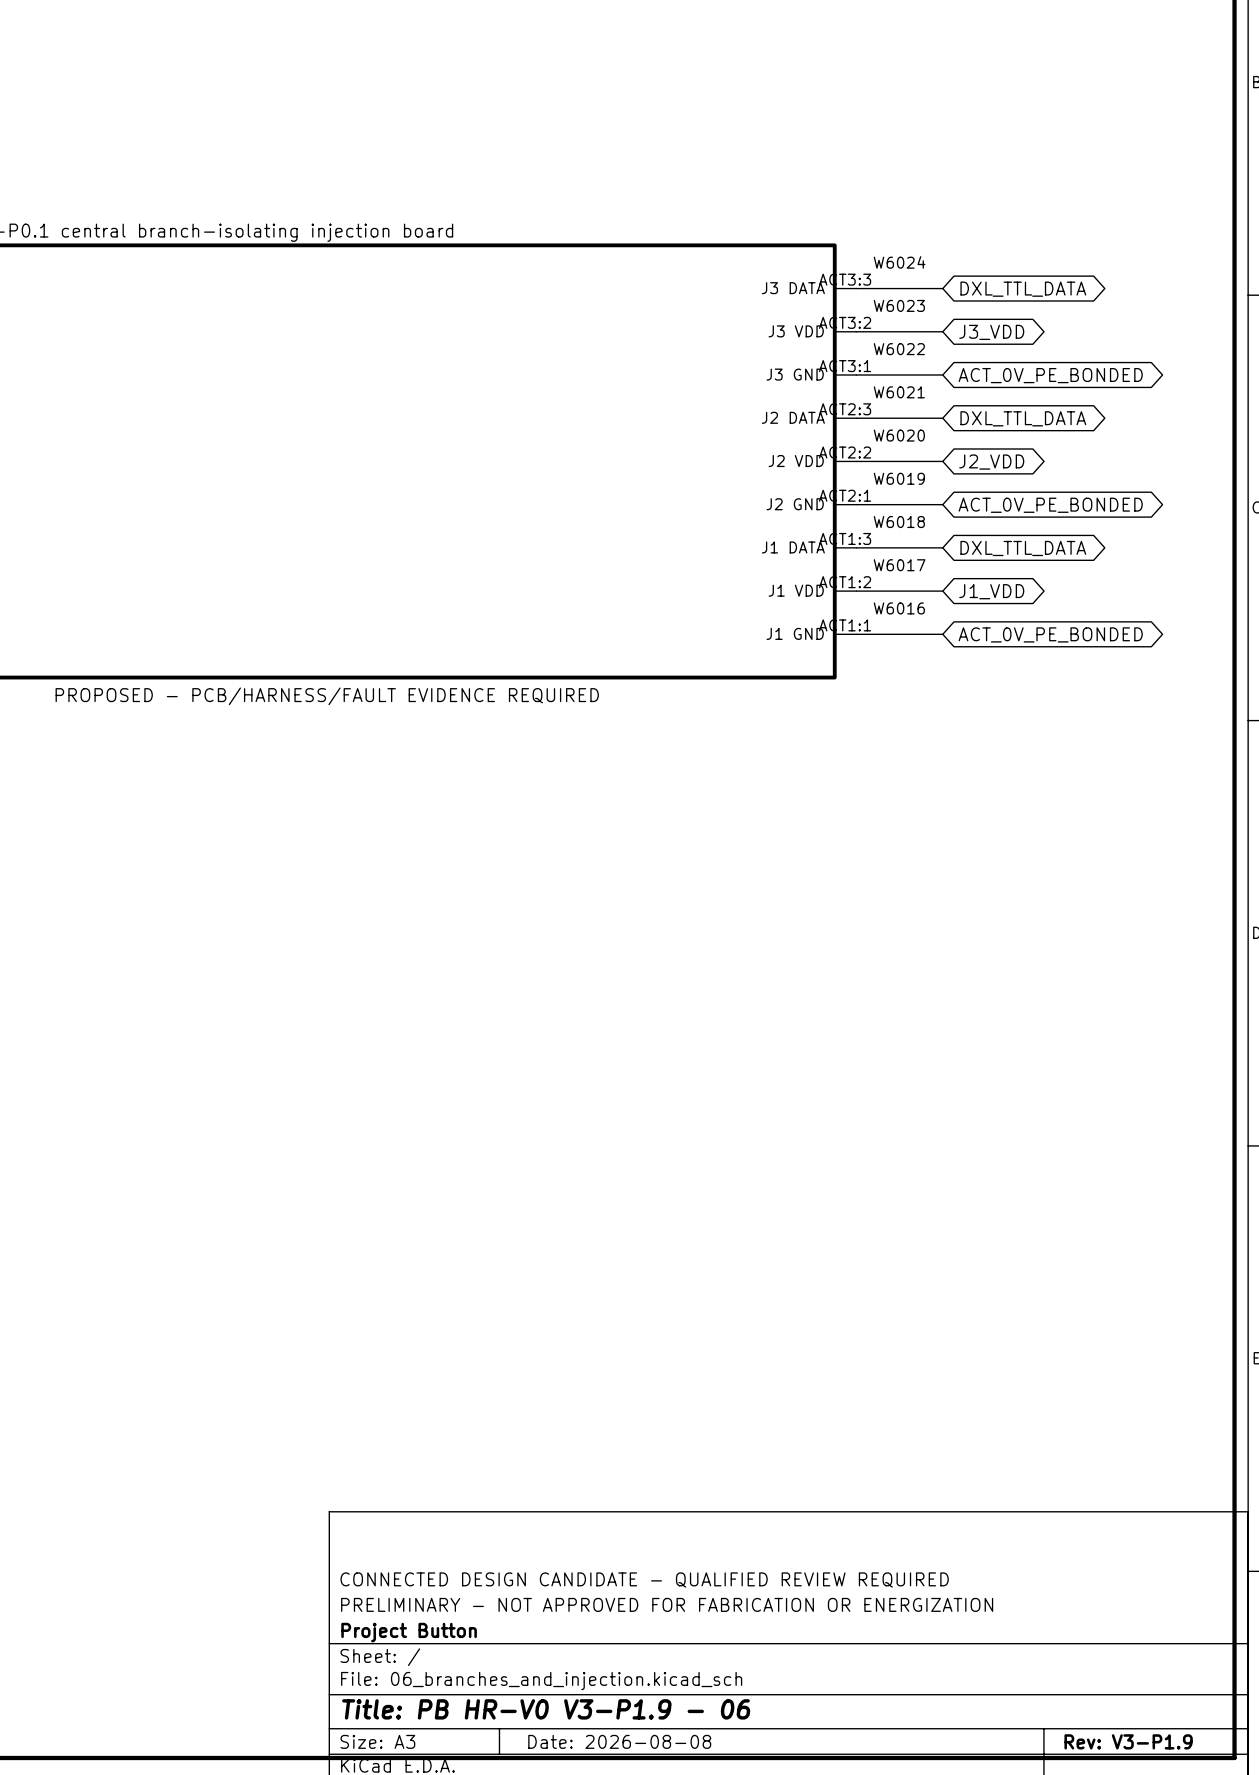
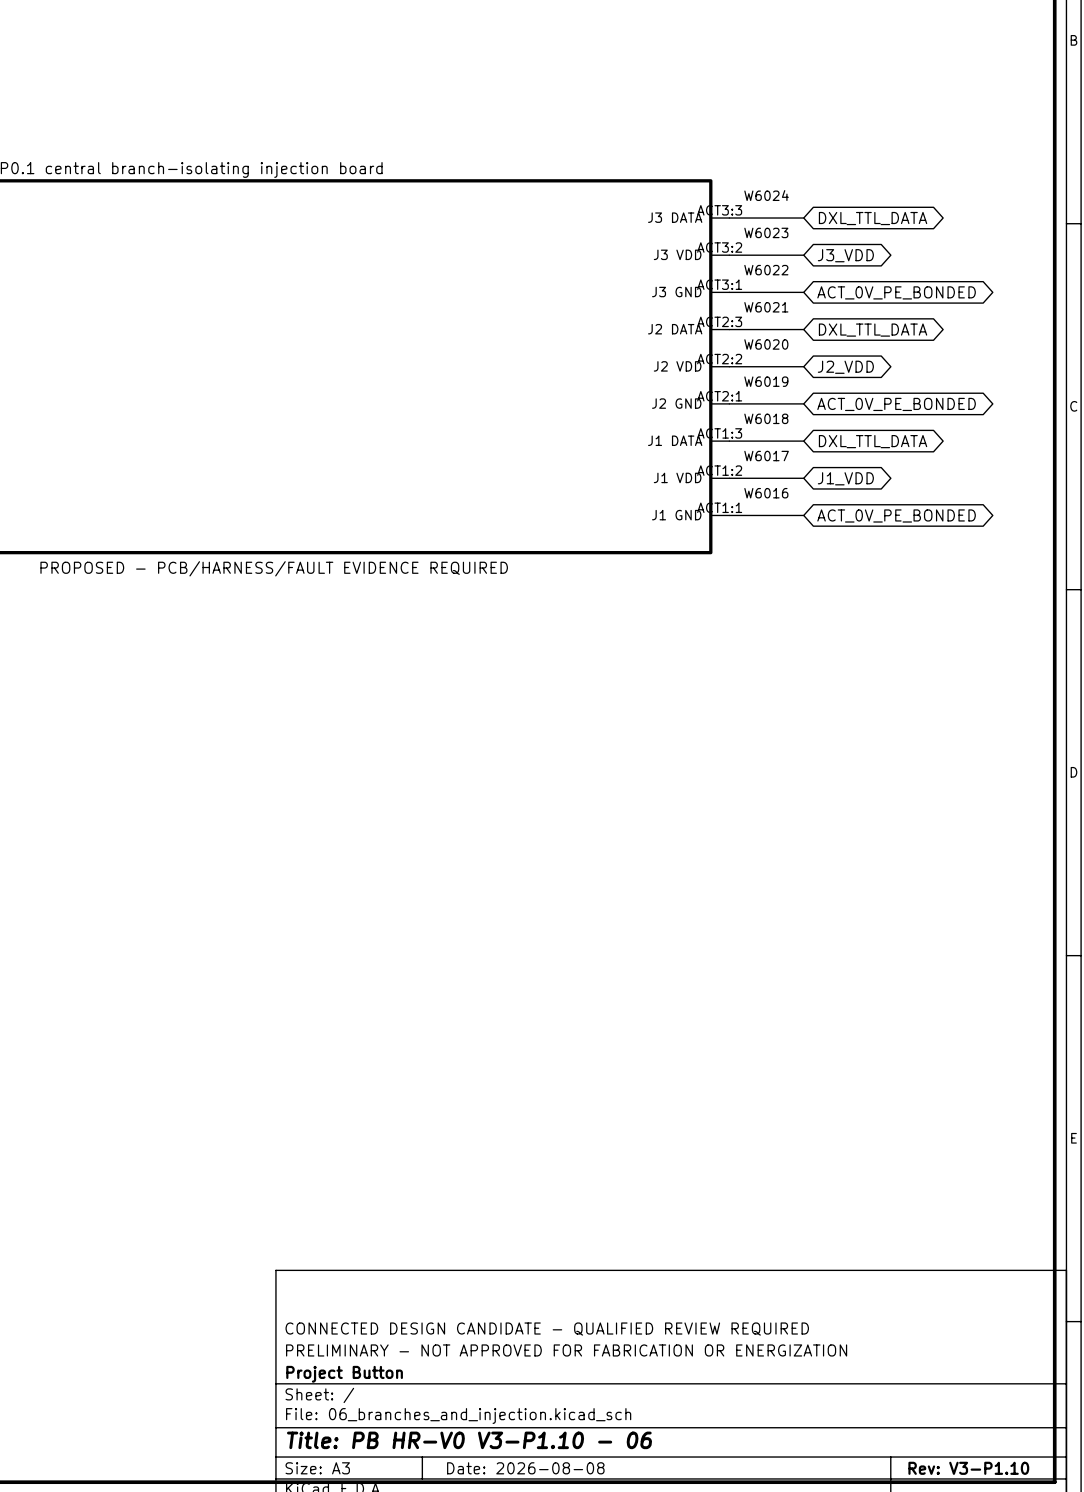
title block: Title: PB HR-V0 V3-P1.9 - 06 (546, 1709) -> Title: PB HR-V0 V3-P1.10 - 06 (469, 1440)
title block: Rev: V3-P1.9 (1128, 1741) -> Rev: V3-P1.10 (968, 1468)

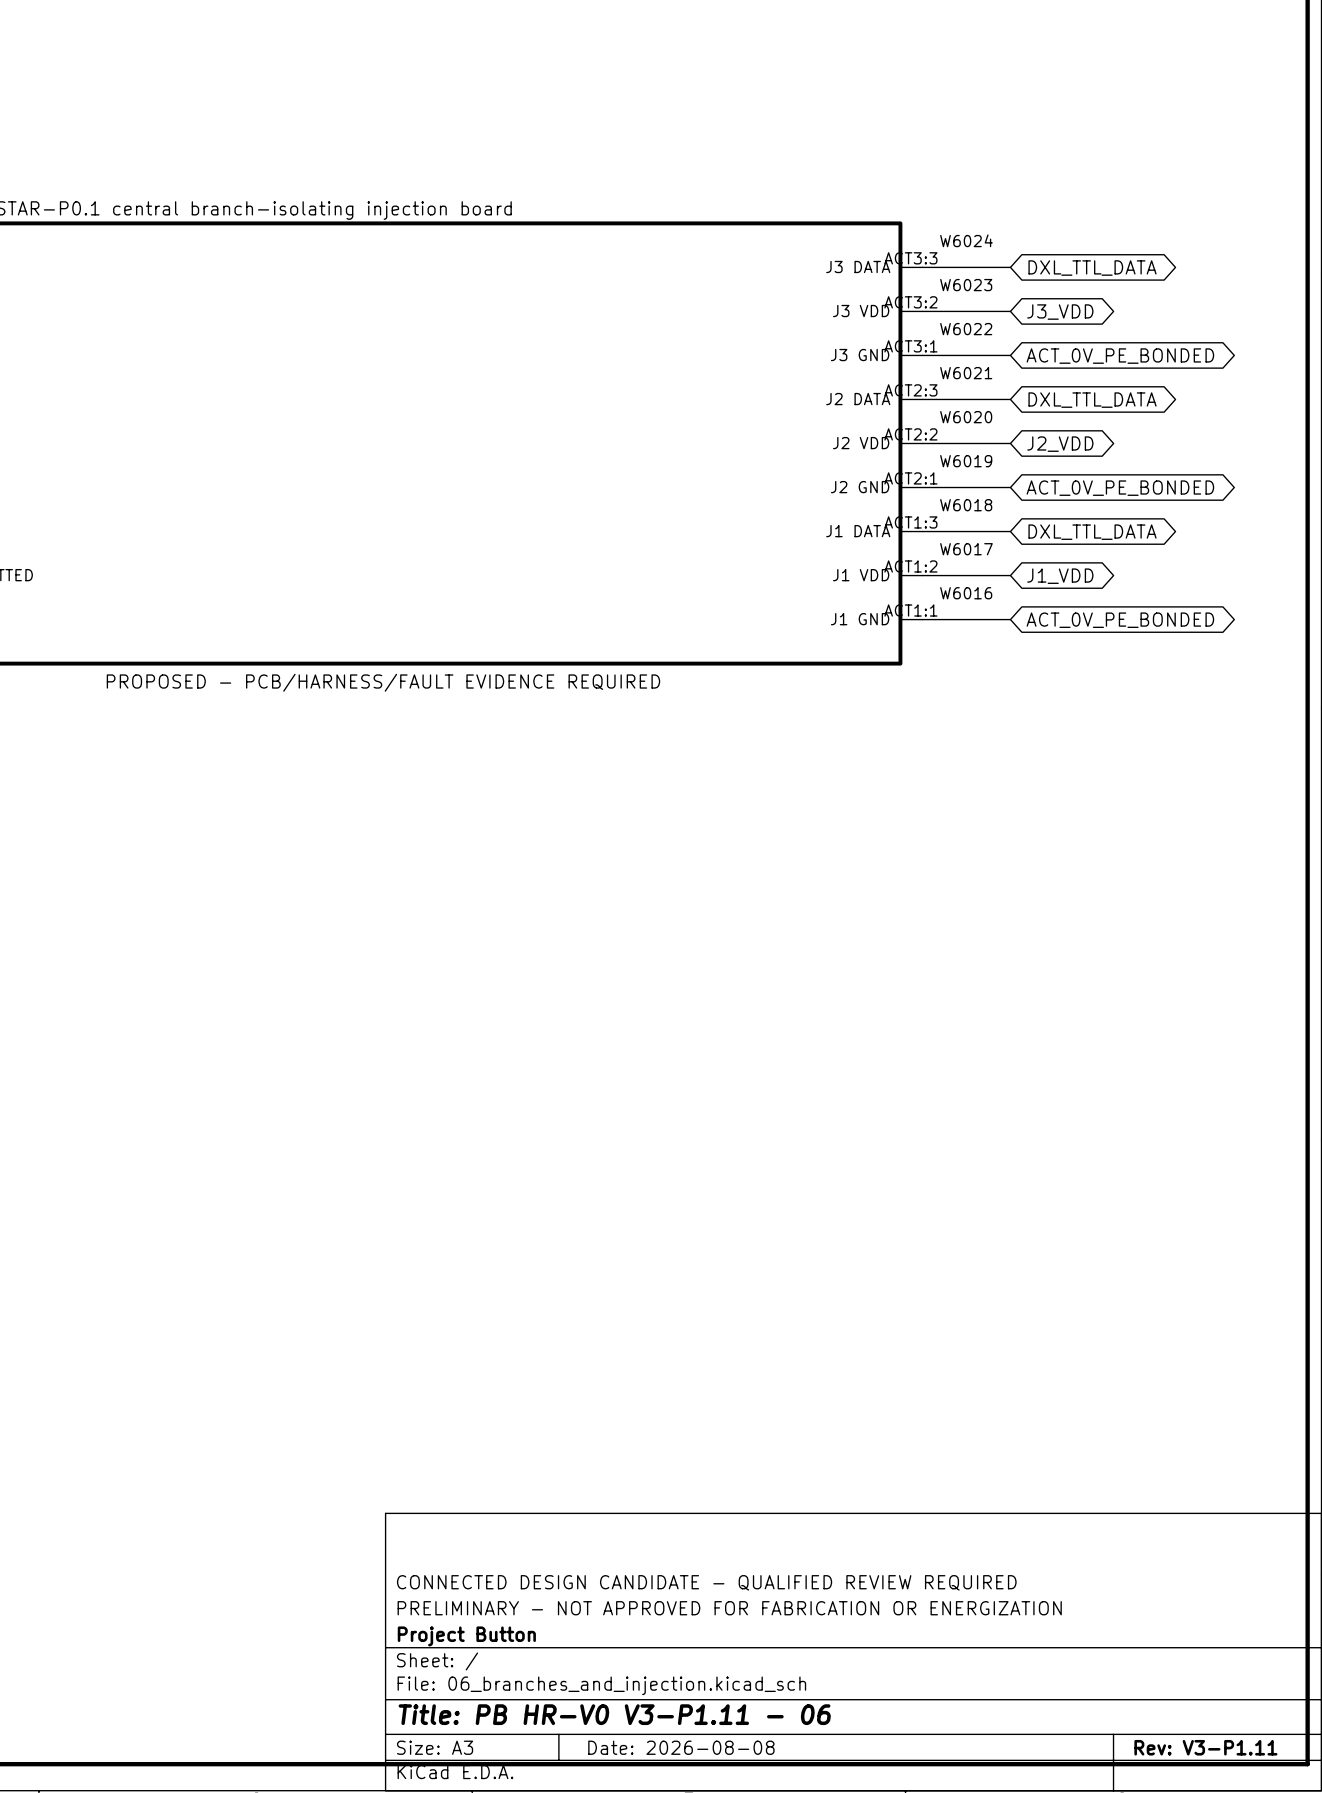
title block: Title: PB HR-V0 V3-P1.10 - 06 (469, 1440) -> Title: PB HR-V0 V3-P1.11 - 06 (614, 1714)
title block: Rev: V3-P1.10 (968, 1468) -> Rev: V3-P1.11 (1205, 1747)

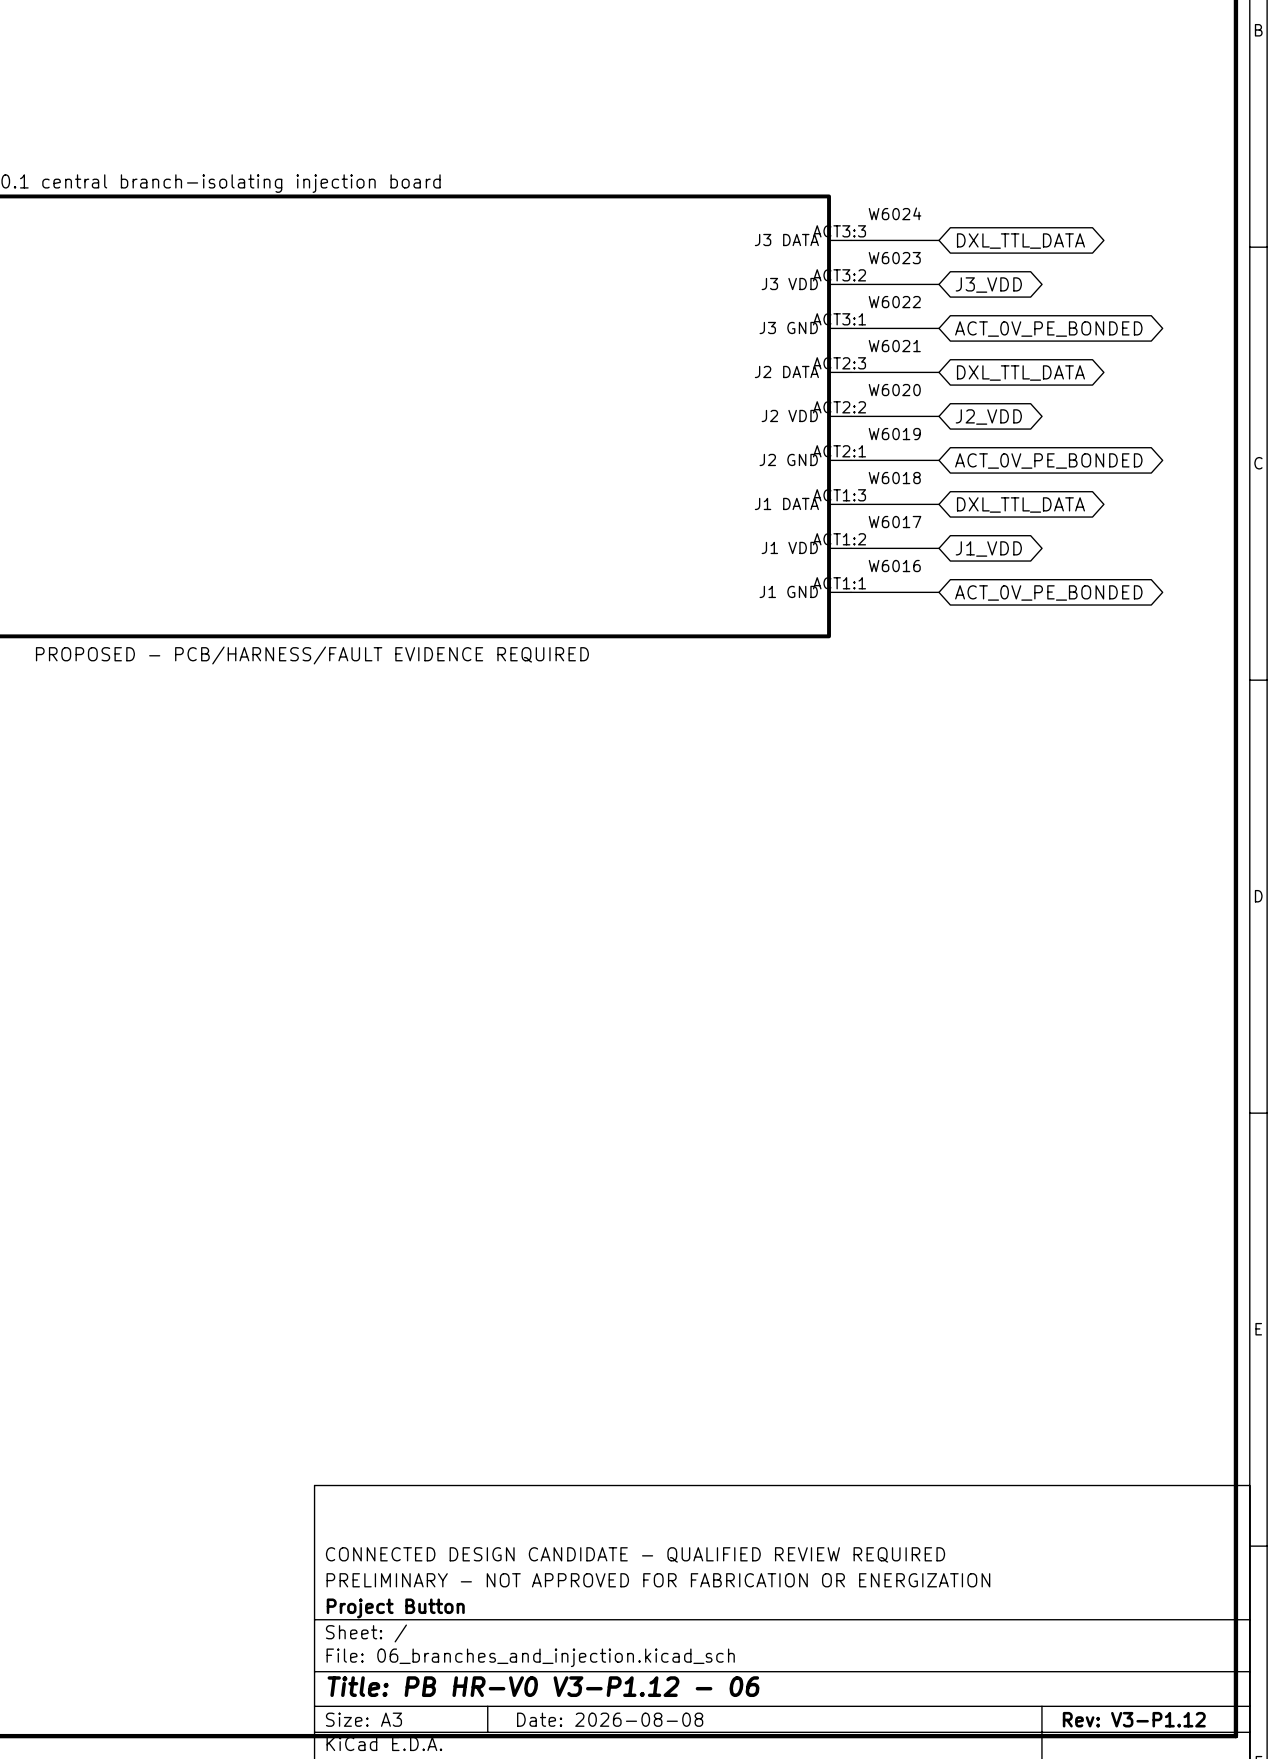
title block: Title: PB HR-V0 V3-P1.11 - 06 (614, 1714) -> Title: PB HR-V0 V3-P1.12 - 06 (543, 1686)
title block: Rev: V3-P1.11 (1205, 1747) -> Rev: V3-P1.12 (1134, 1719)

